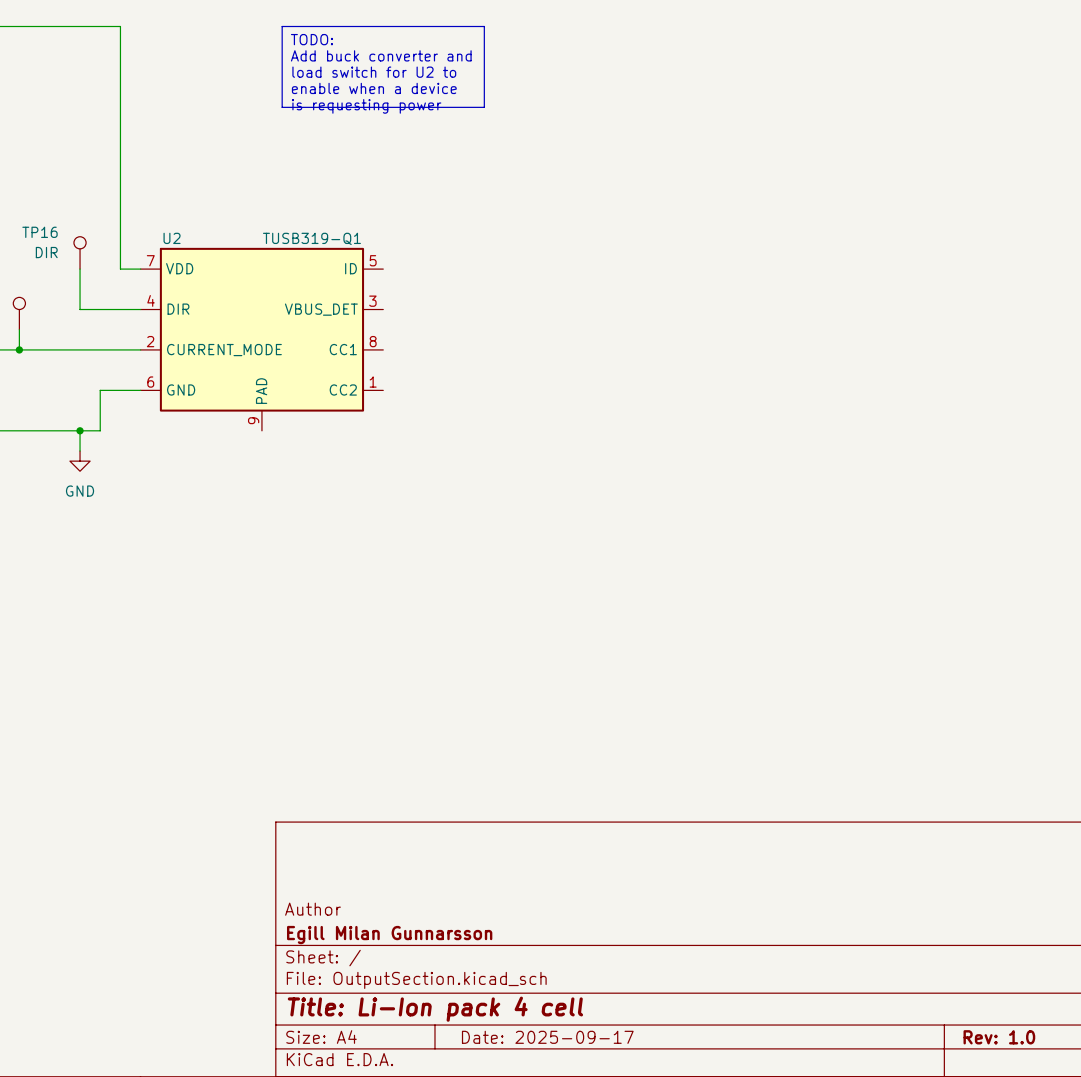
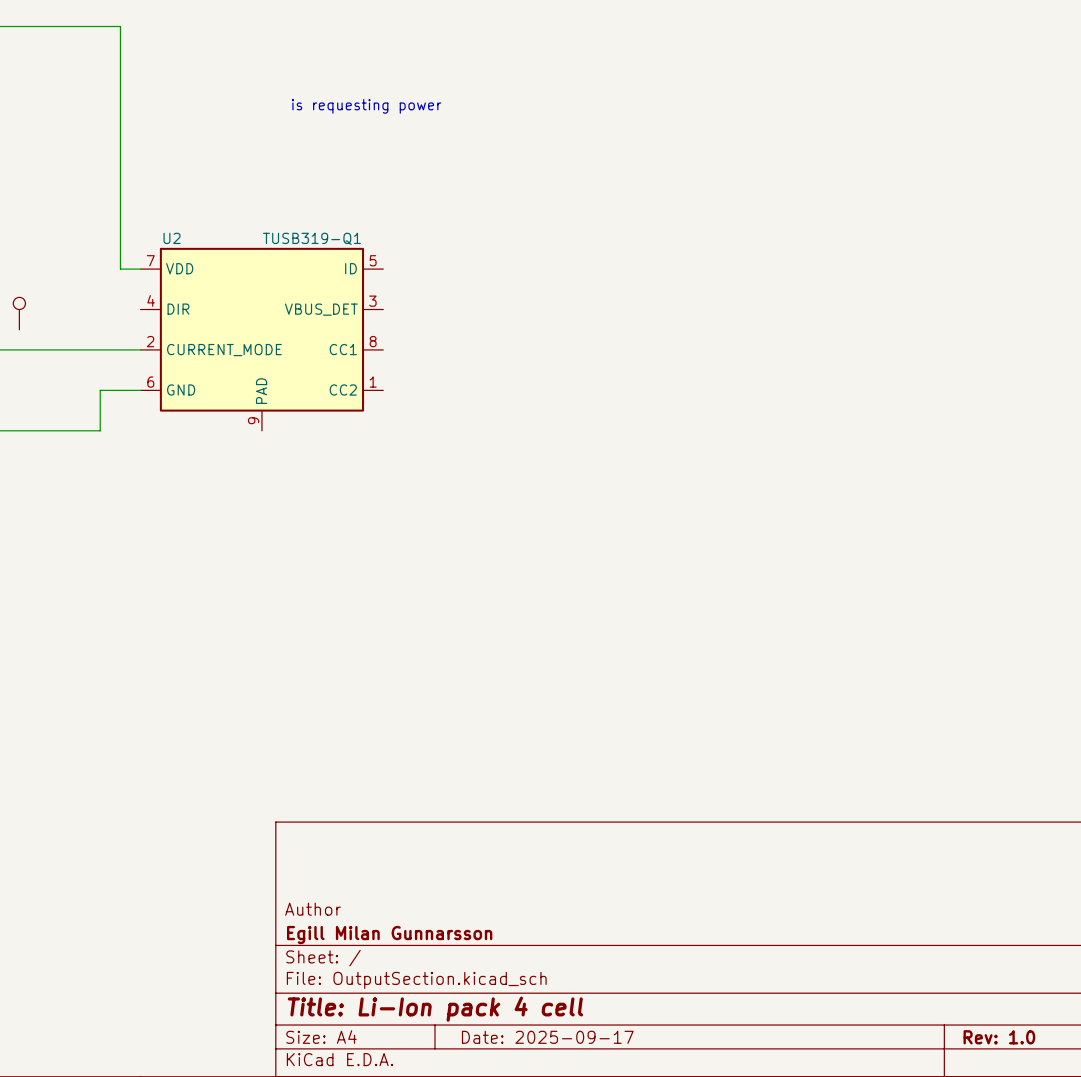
line: (282, 26) (484, 26) (484, 107) (282, 107) (282, 26) -> none
text: TODO: (311, 39) -> none
text: Add buck converter and (381, 55) -> none
text: load switch for U2 to (374, 72) -> none
text: enable when a device (374, 88) -> none
TP16: DIR (80, 252) -> none
wire: (80, 269) (80, 309) (140, 309) -> none
wire: (19, 329) (19, 349) -> none
junction: (19, 349) -> none
wire: (80, 430) (80, 451) -> none
junction: (80, 430) -> none
power symbol: GND (80, 461) -> none

